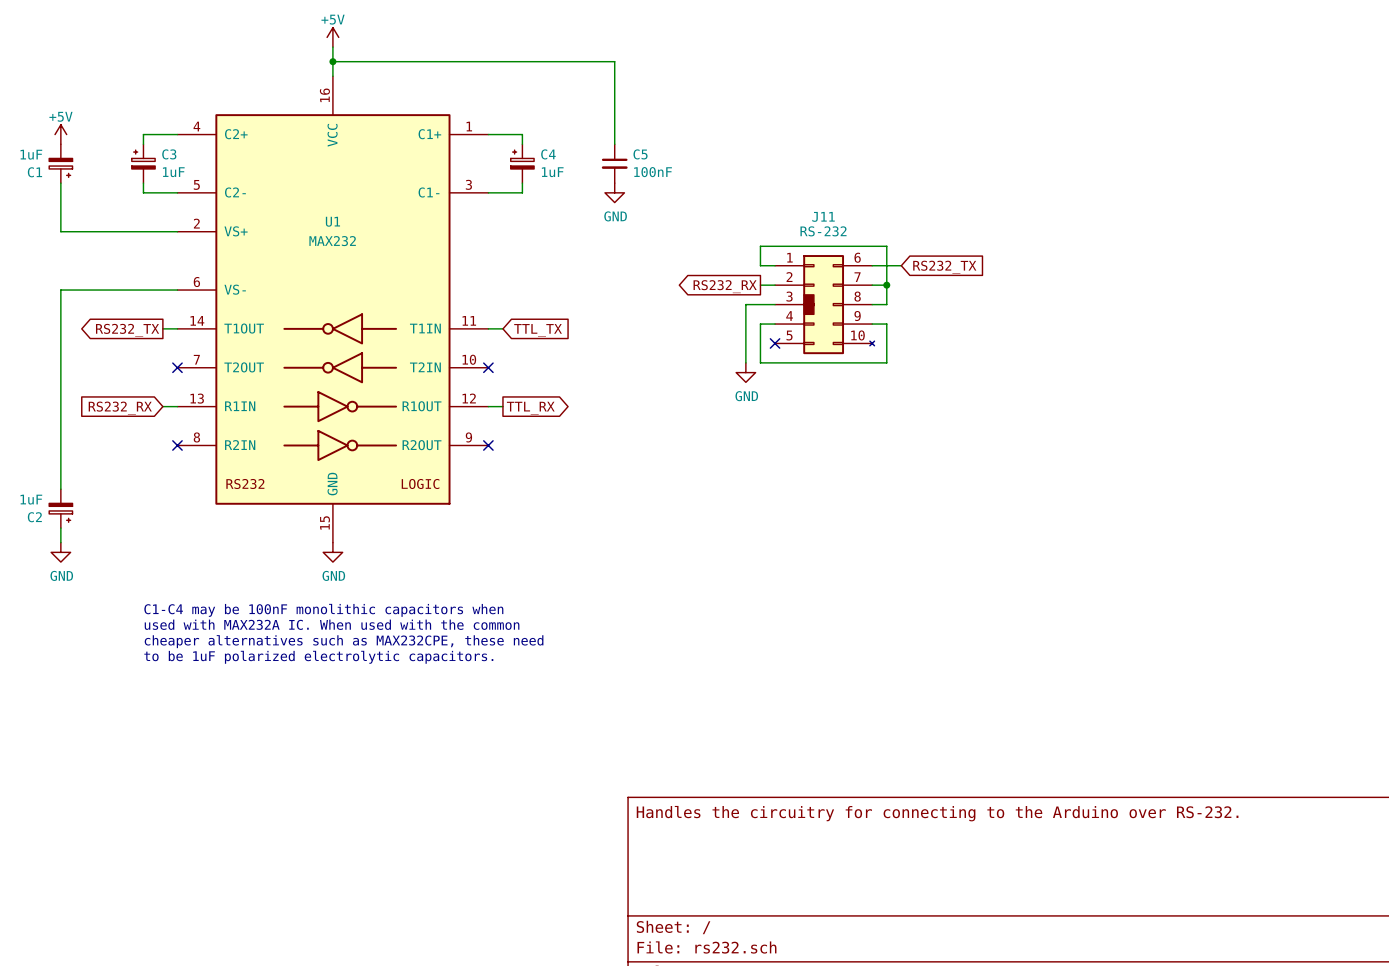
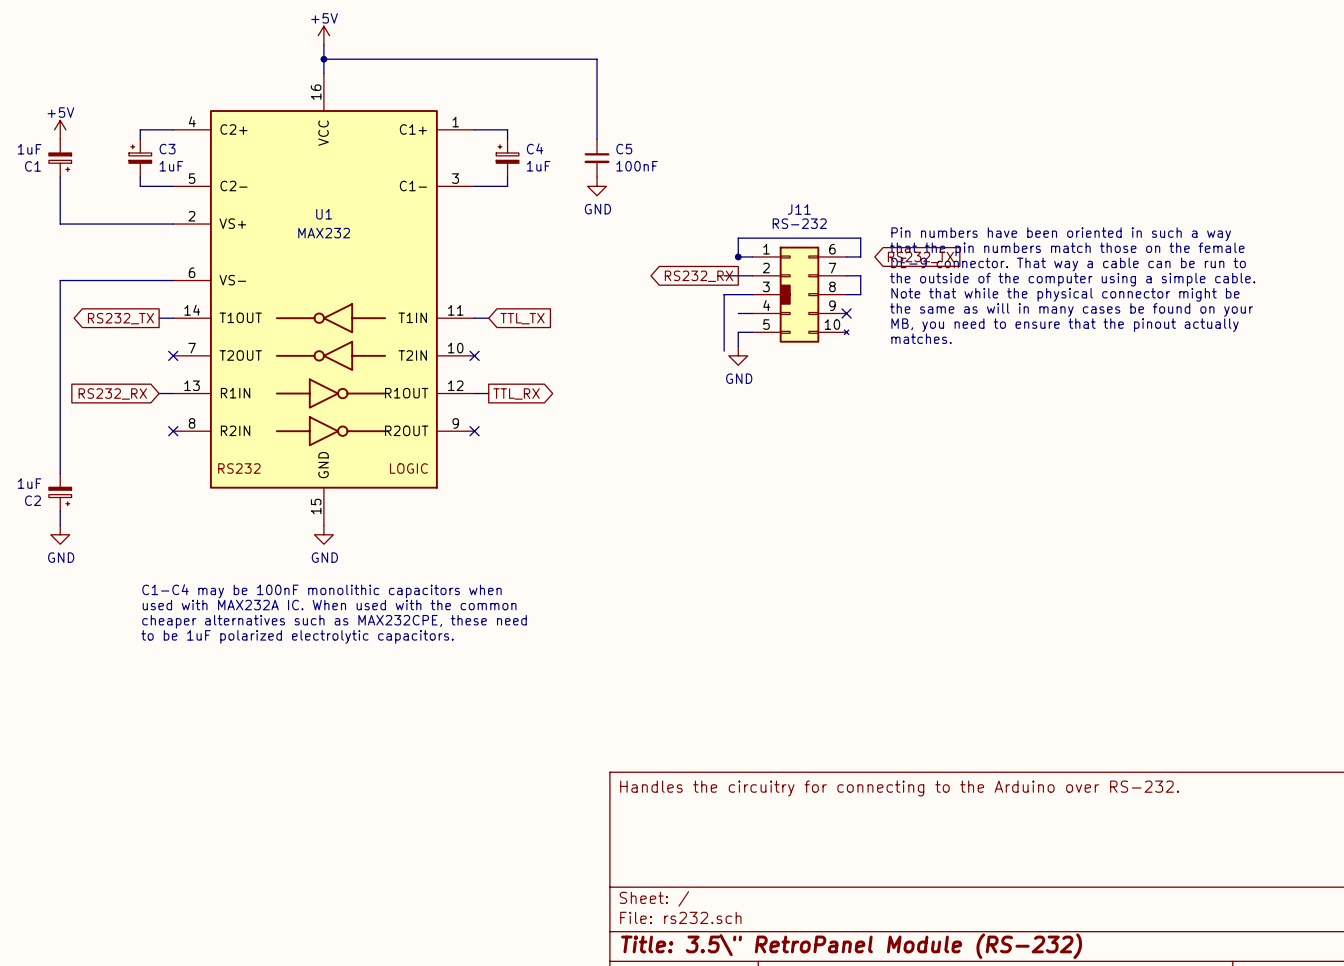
text: none -> Pin numbers have been oriented in such a way (1061, 234)
text: none -> that the pin numbers match those on the female (1067, 249)
junction: none -> (738, 256)
wire: (901, 265) (886, 265) (886, 285) -> none
text: none -> DE-9 connector. That way a cable can be run to (1068, 264)
wire: none -> (724, 275) (738, 275)
junction: (886, 285) -> none
text: none -> the outside of the computer using a simple cable. (1072, 279)
text: none -> Note that while the physical connector might be (1065, 294)
text: none -> the same as will in many cases be found on your (1071, 309)
wire: (760, 324) (760, 343) -> (752, 332) (738, 332)
wire: (872, 324) (886, 324) (886, 362) (760, 362) (760, 358) -> none
no-connect mark: none -> (846, 313)
text: none -> MB, you need to ensure that the pinout actually (1065, 325)
no-connect mark: (775, 343) -> none
text: none -> matches. (921, 338)
power symbol position: GND (745, 372) -> GND (738, 355)

